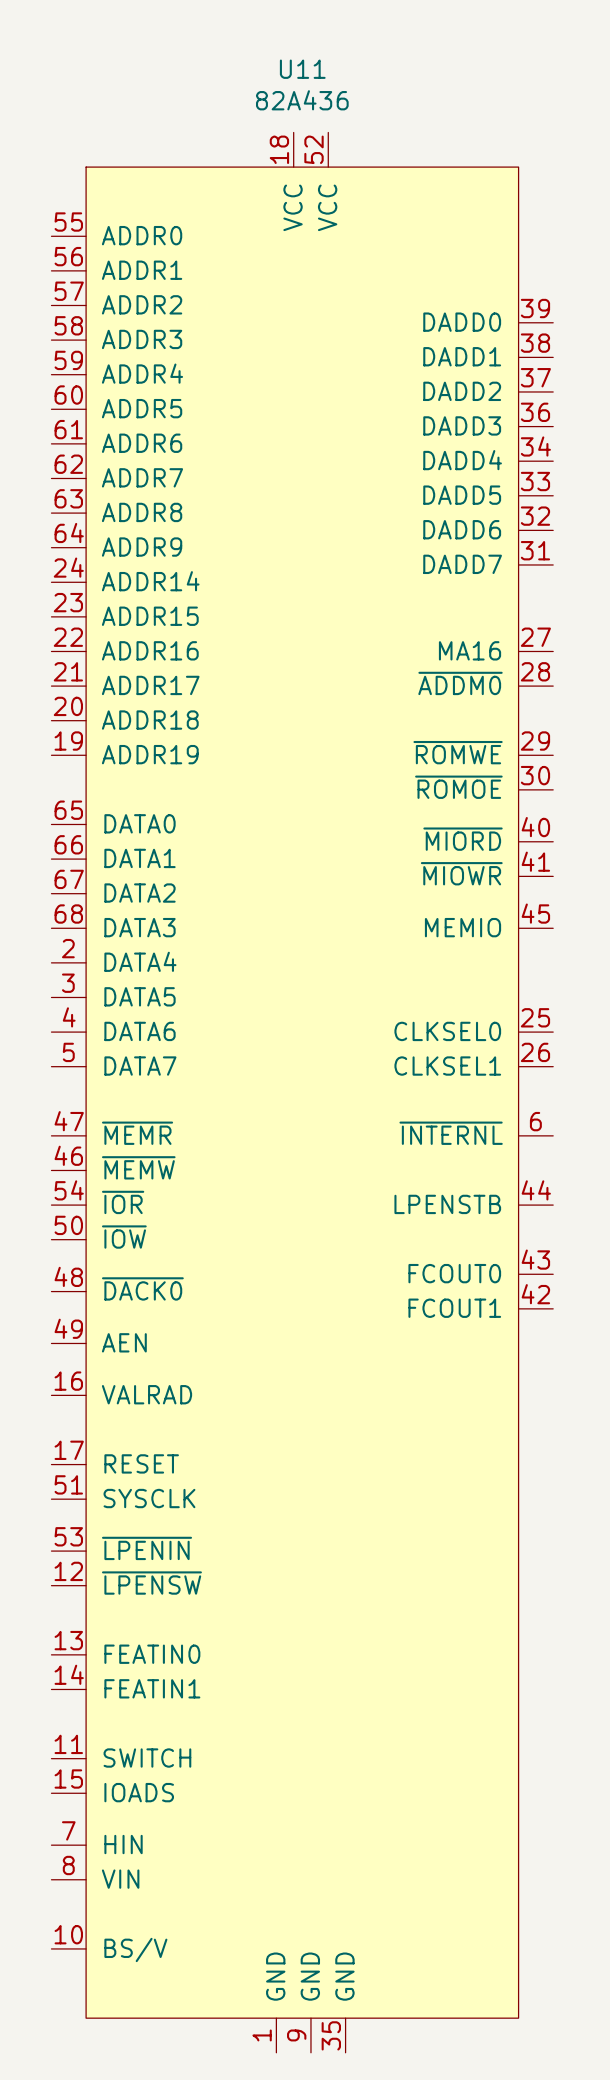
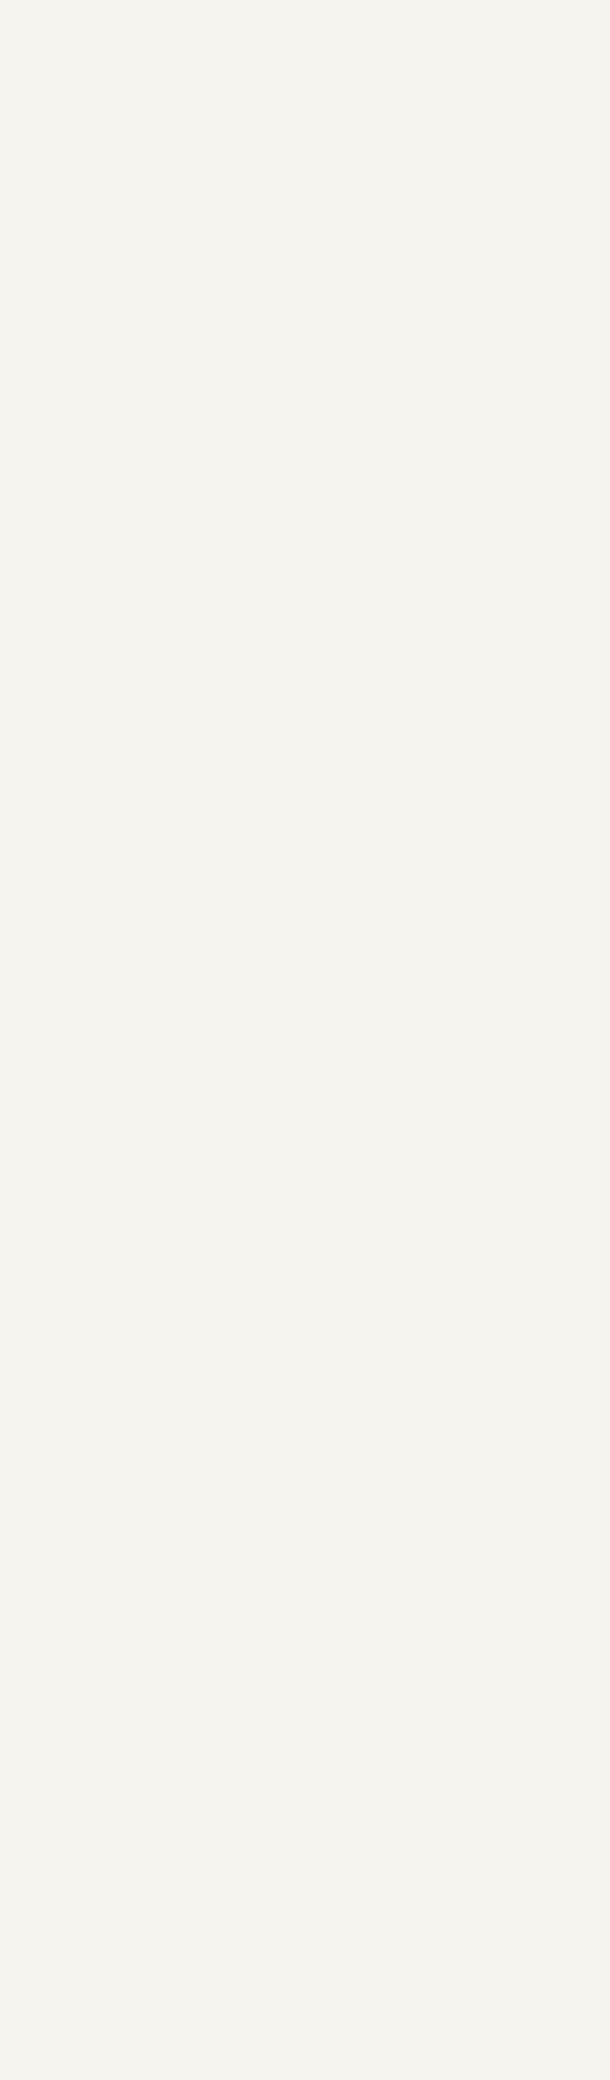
U11: 82A436 (302, 1092) -> none

